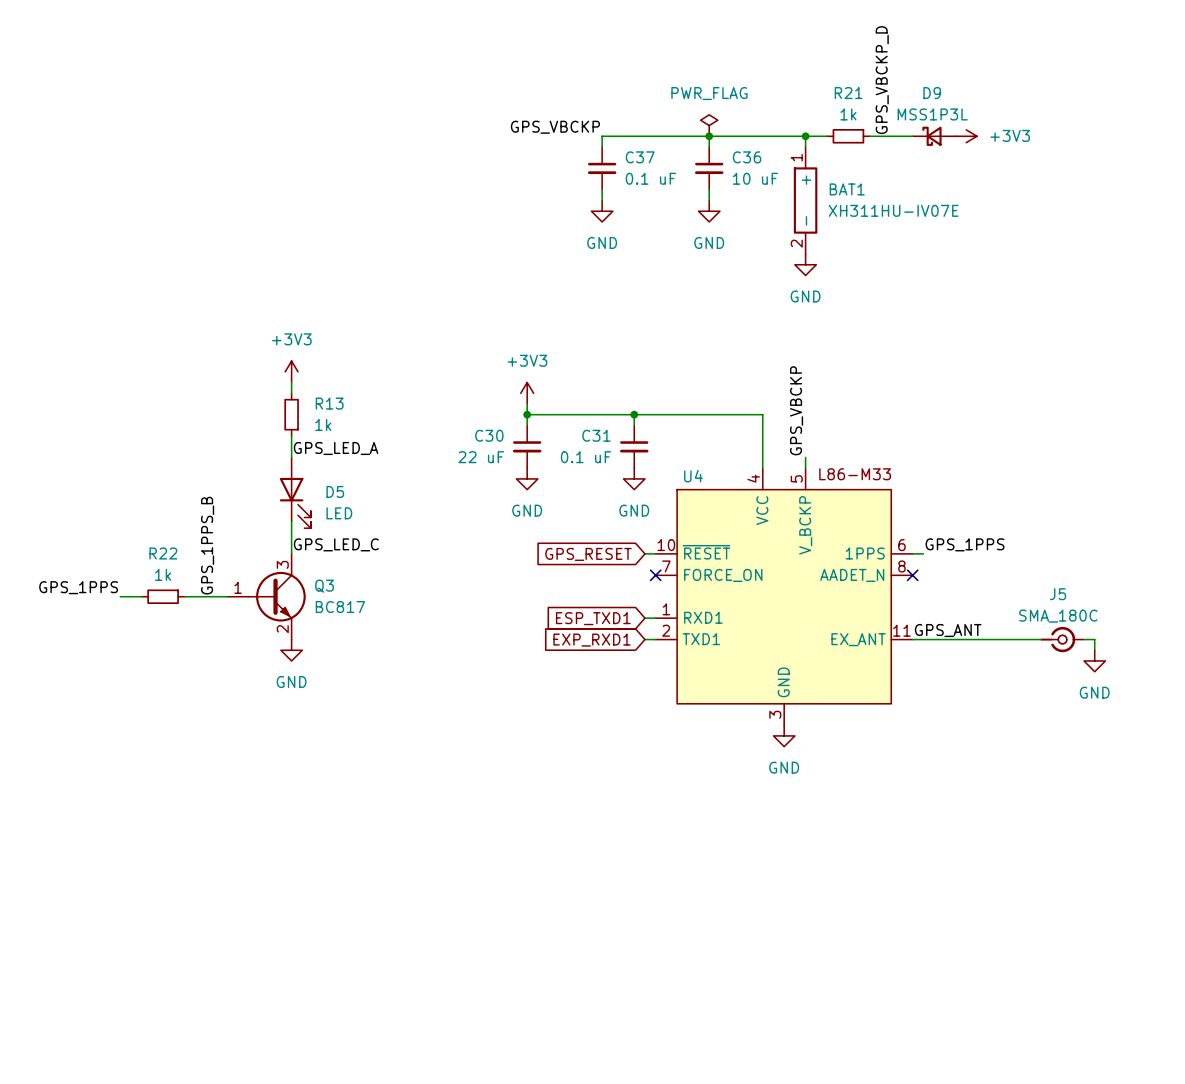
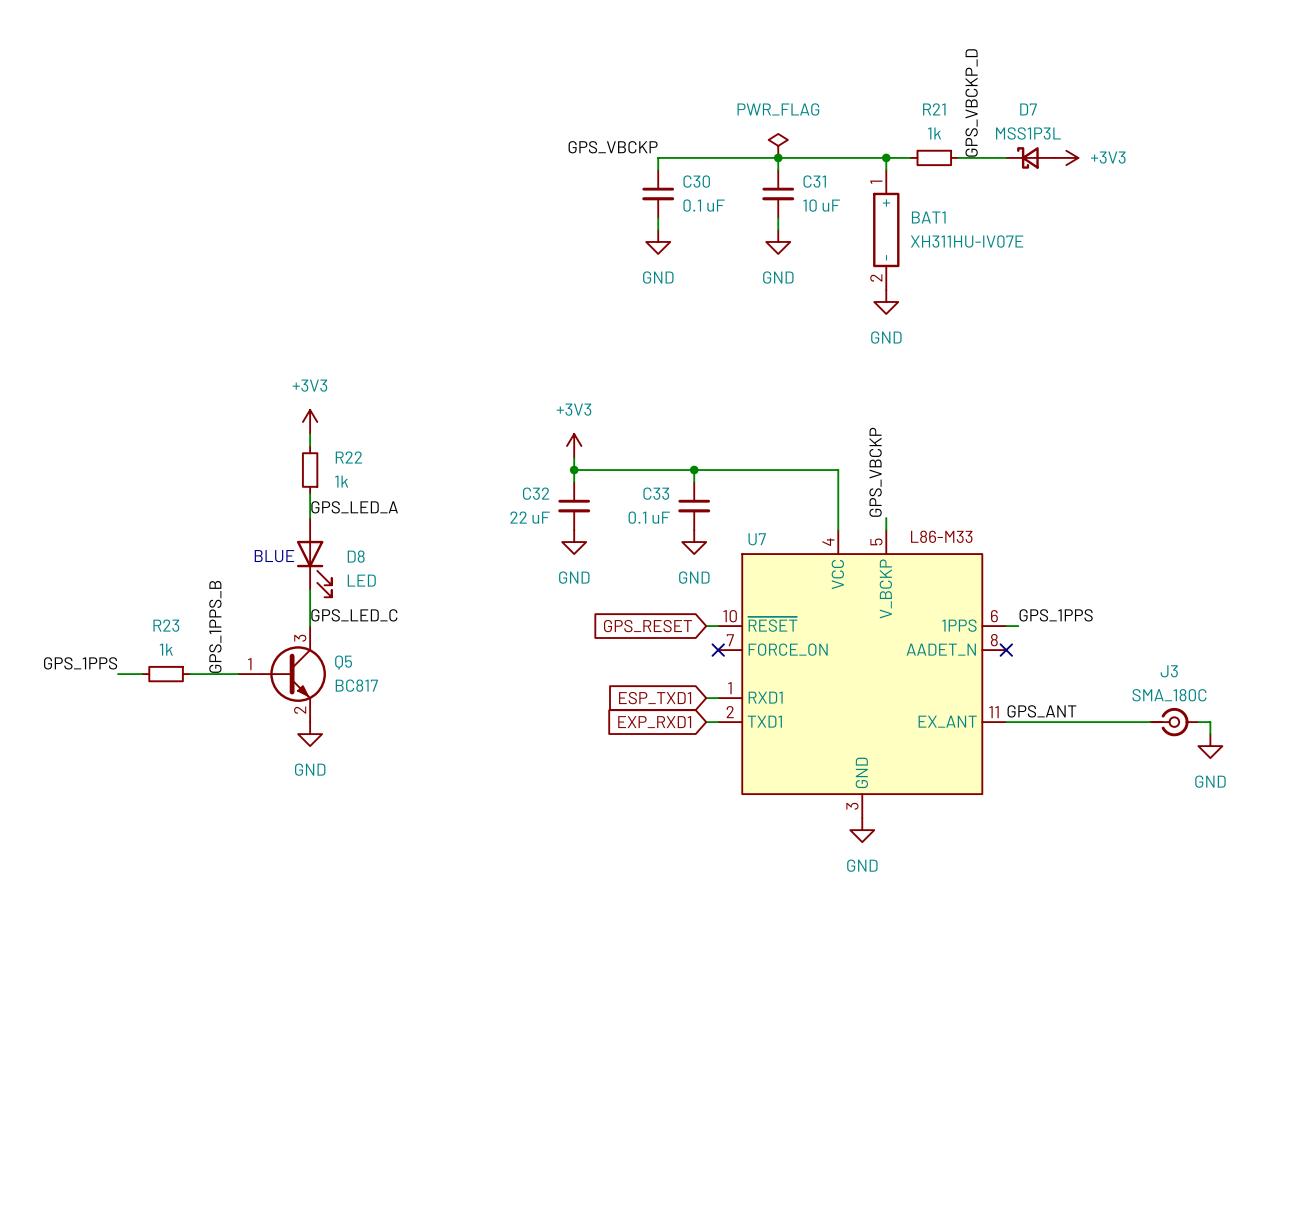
D9 name: D9 (932, 93) -> D7 (1028, 109)
C37 name: C37 (640, 157) -> C30 (696, 181)
C36 name: C36 (747, 157) -> C31 (814, 181)
R13 name: R13 (329, 403) -> R22 (348, 457)
C30 name: C30 (489, 435) -> C32 (536, 493)
C31 name: C31 (596, 435) -> C33 (656, 493)
U4 name: U4 (693, 476) -> U7 (757, 539)
text: none -> BLUE (274, 556)
D5 name: D5 (335, 491) -> D8 (356, 556)
R22 name: R22 (163, 553) -> R23 (166, 625)
Q3 name: Q3 (324, 586) -> Q5 (343, 662)
J5 name: J5 (1058, 594) -> J3 (1169, 671)

